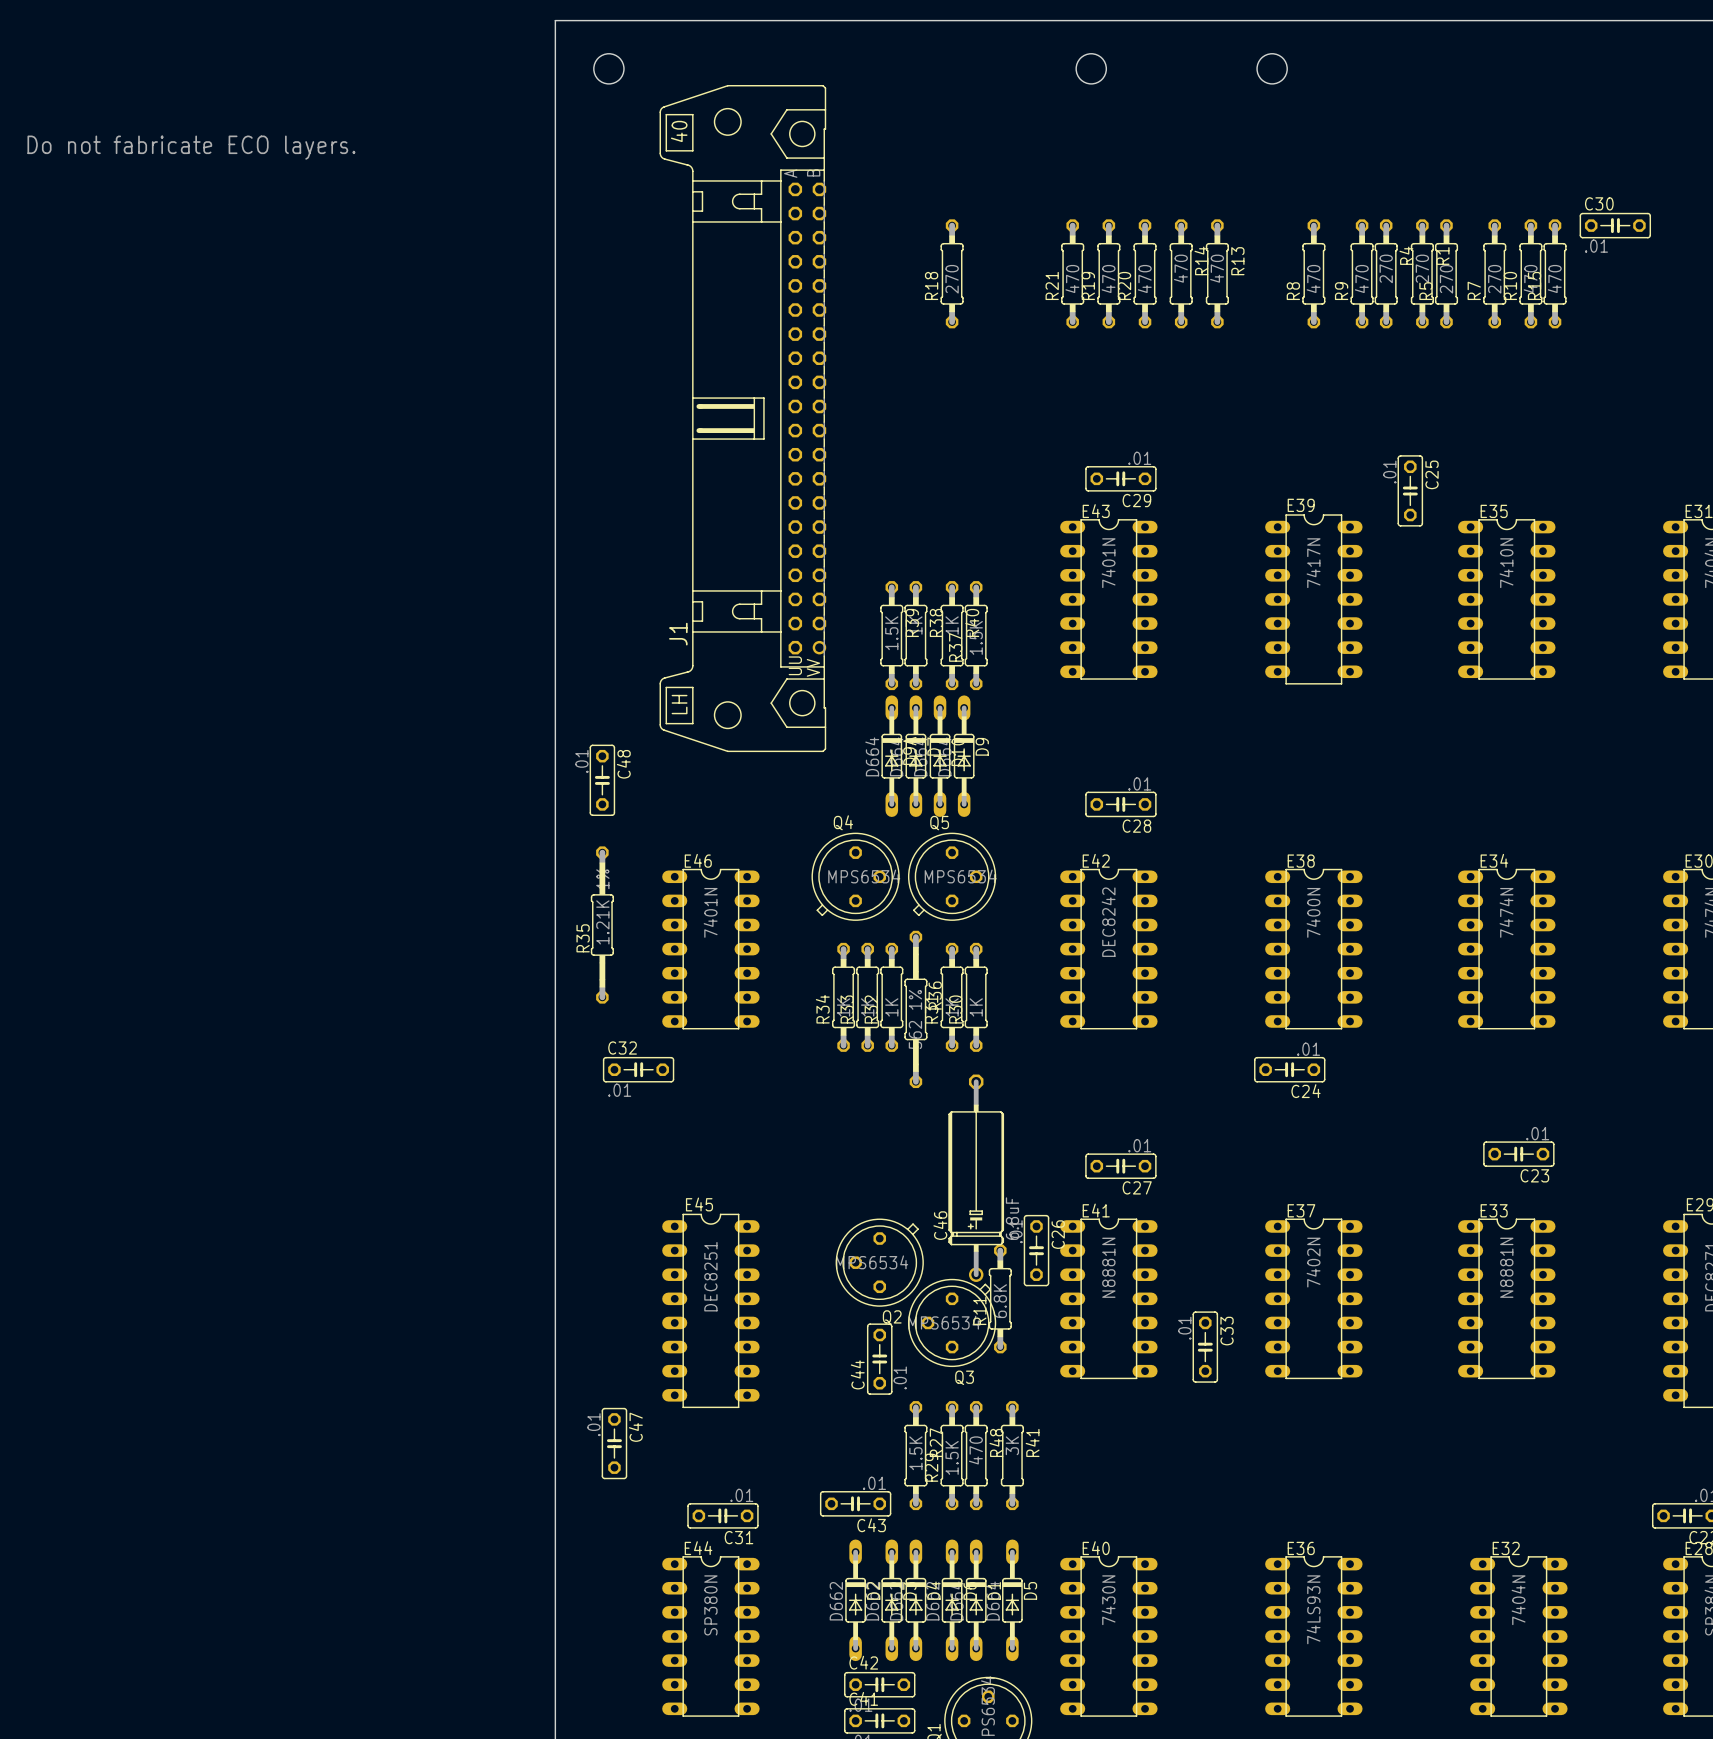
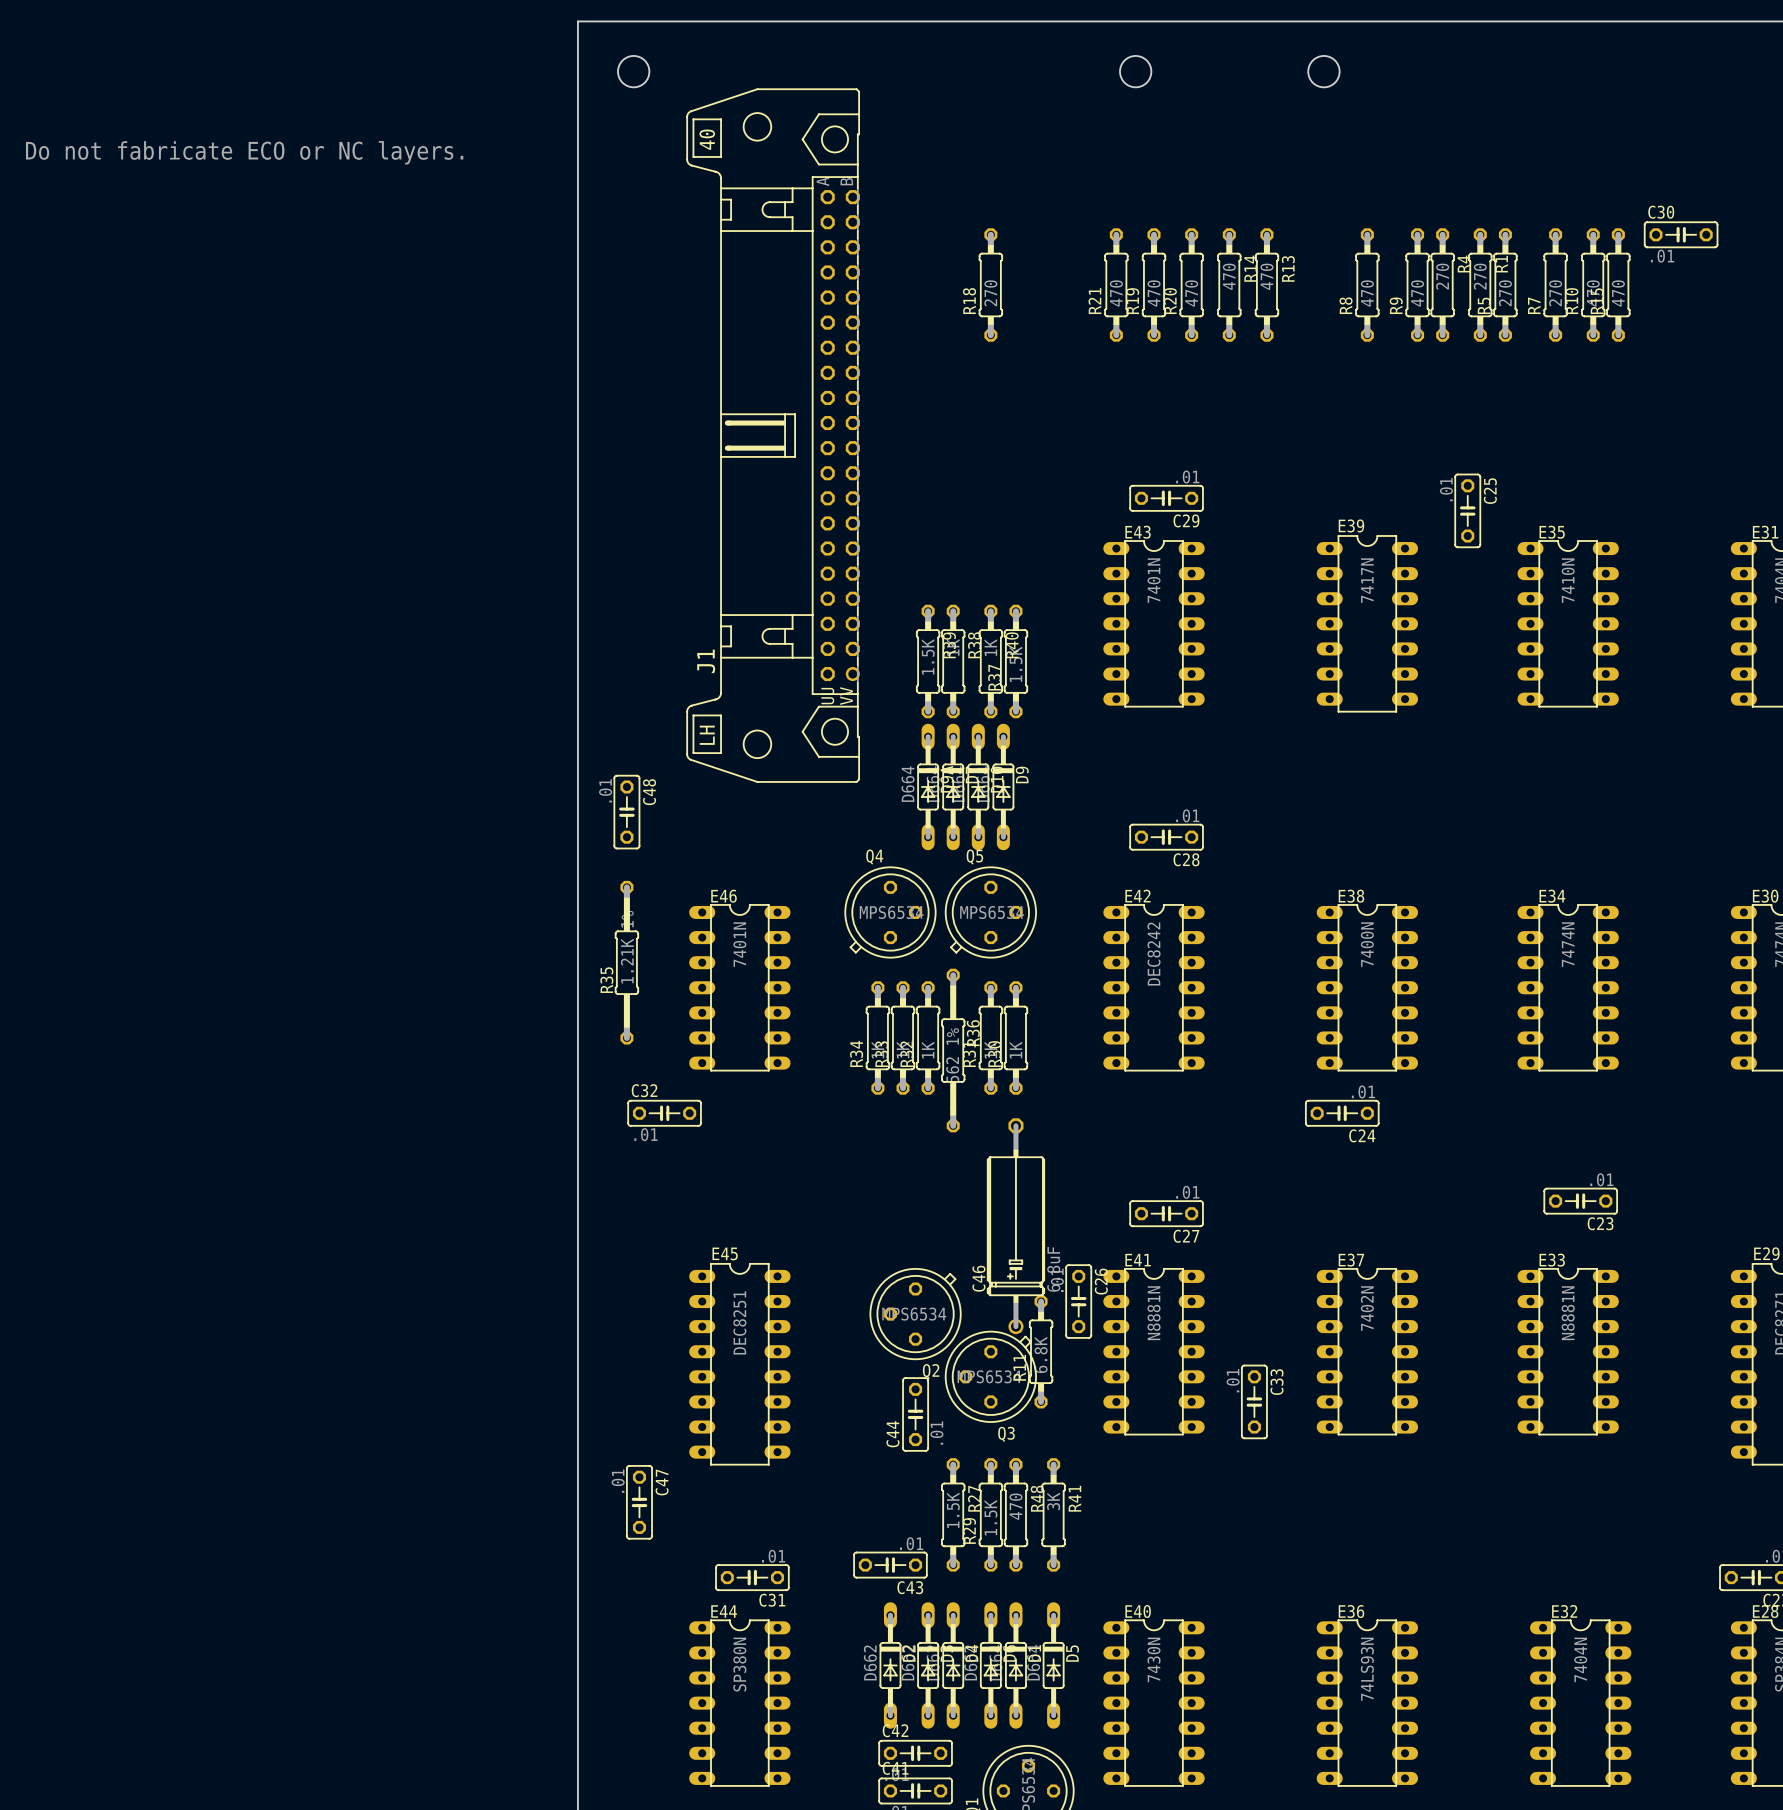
text: Do not fabricate ECO layers. (191, 147) -> Do not fabricate ECO or NC layers. (244, 152)

